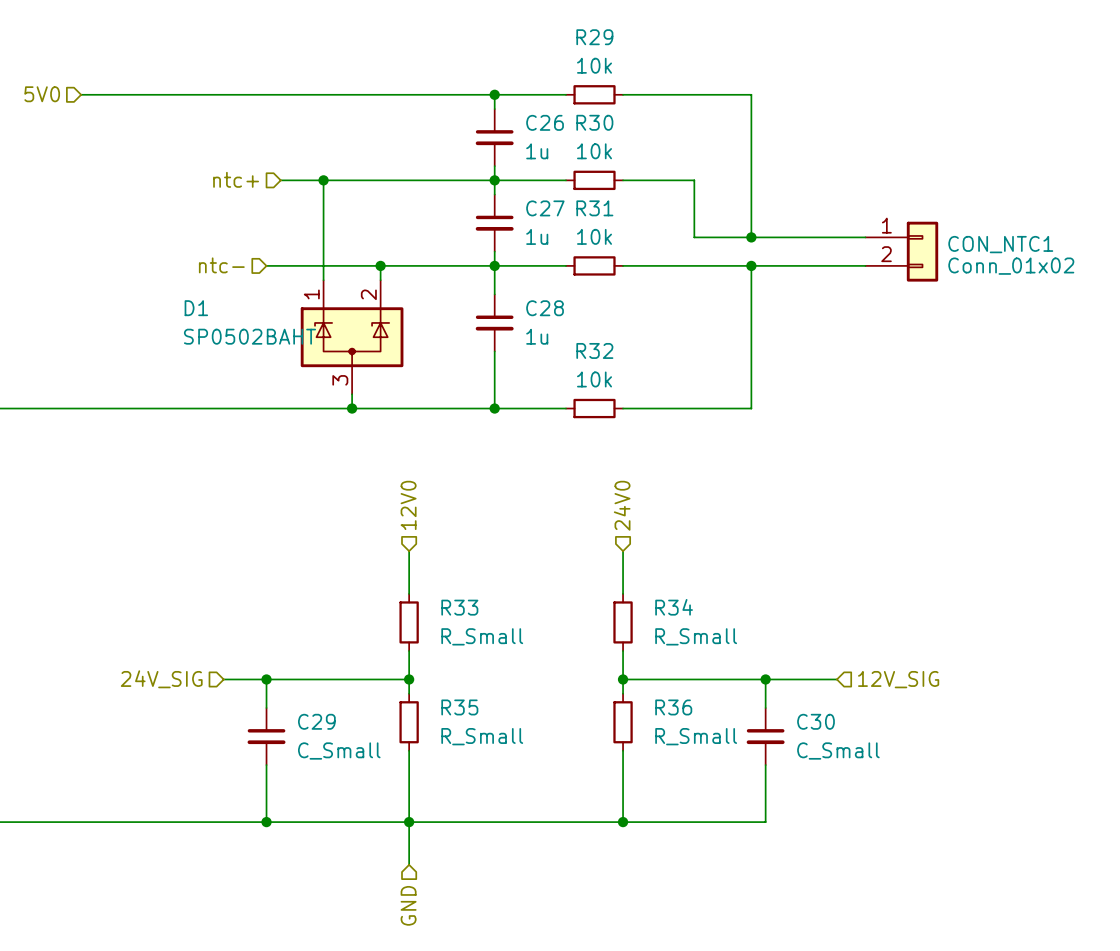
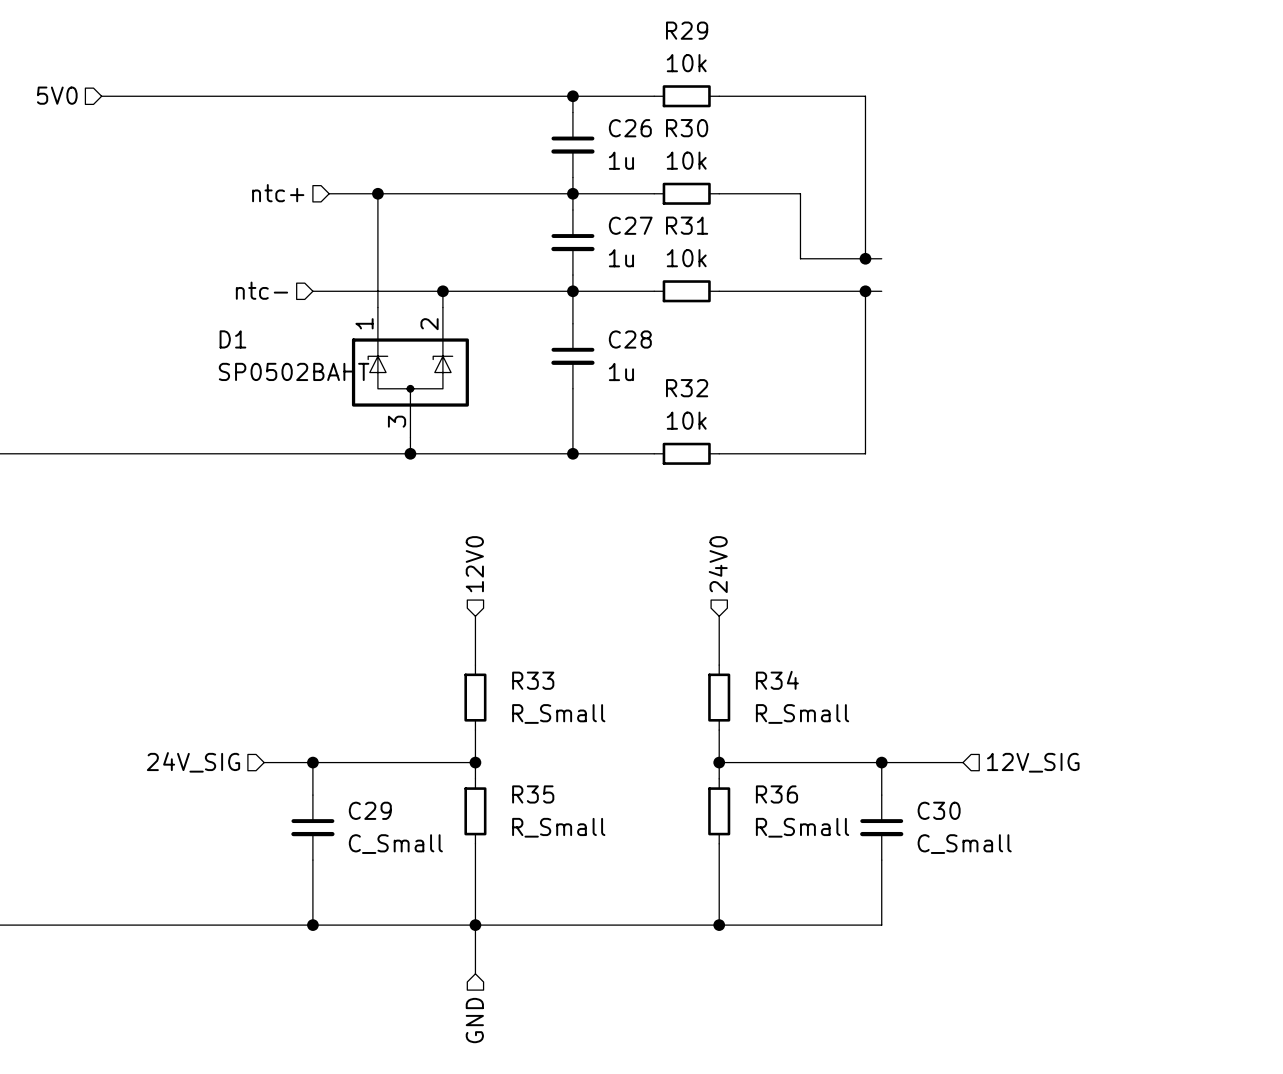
wire: (765, 237) (865, 237) -> none
CON_NTC1: Conn_01x02 (901, 251) -> none
wire: (765, 265) (865, 265) -> none

